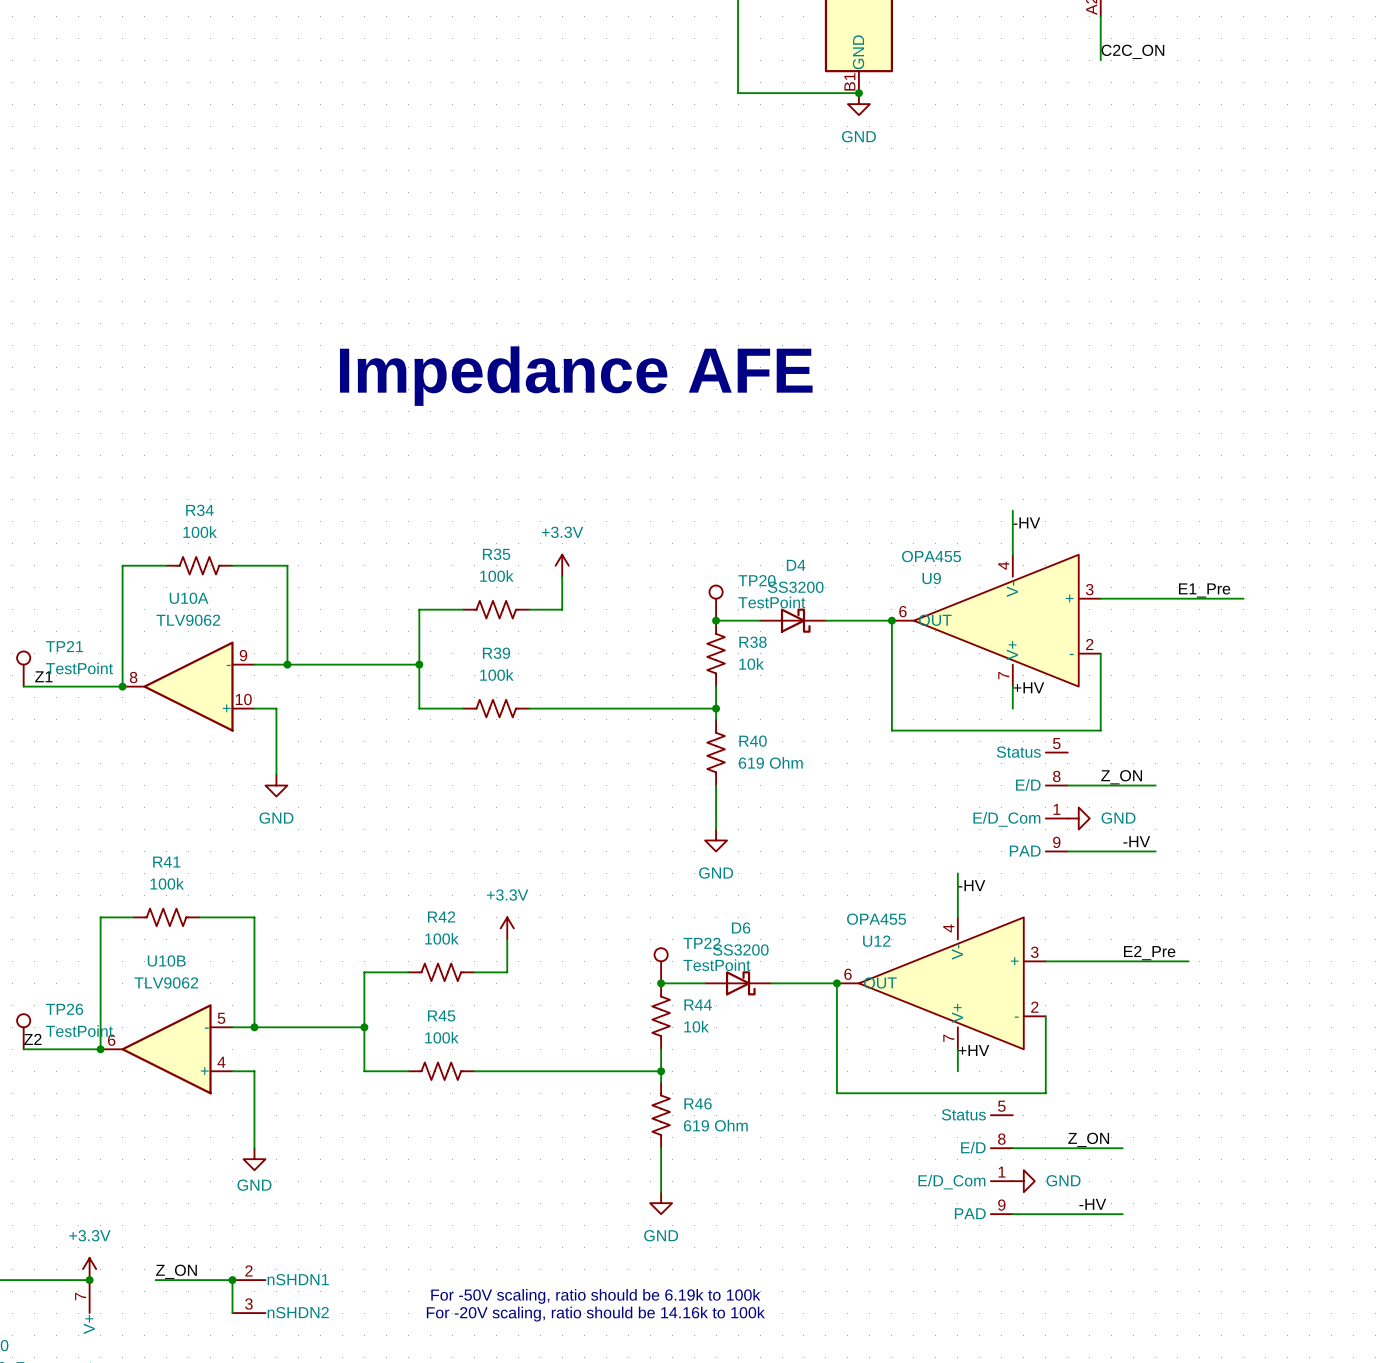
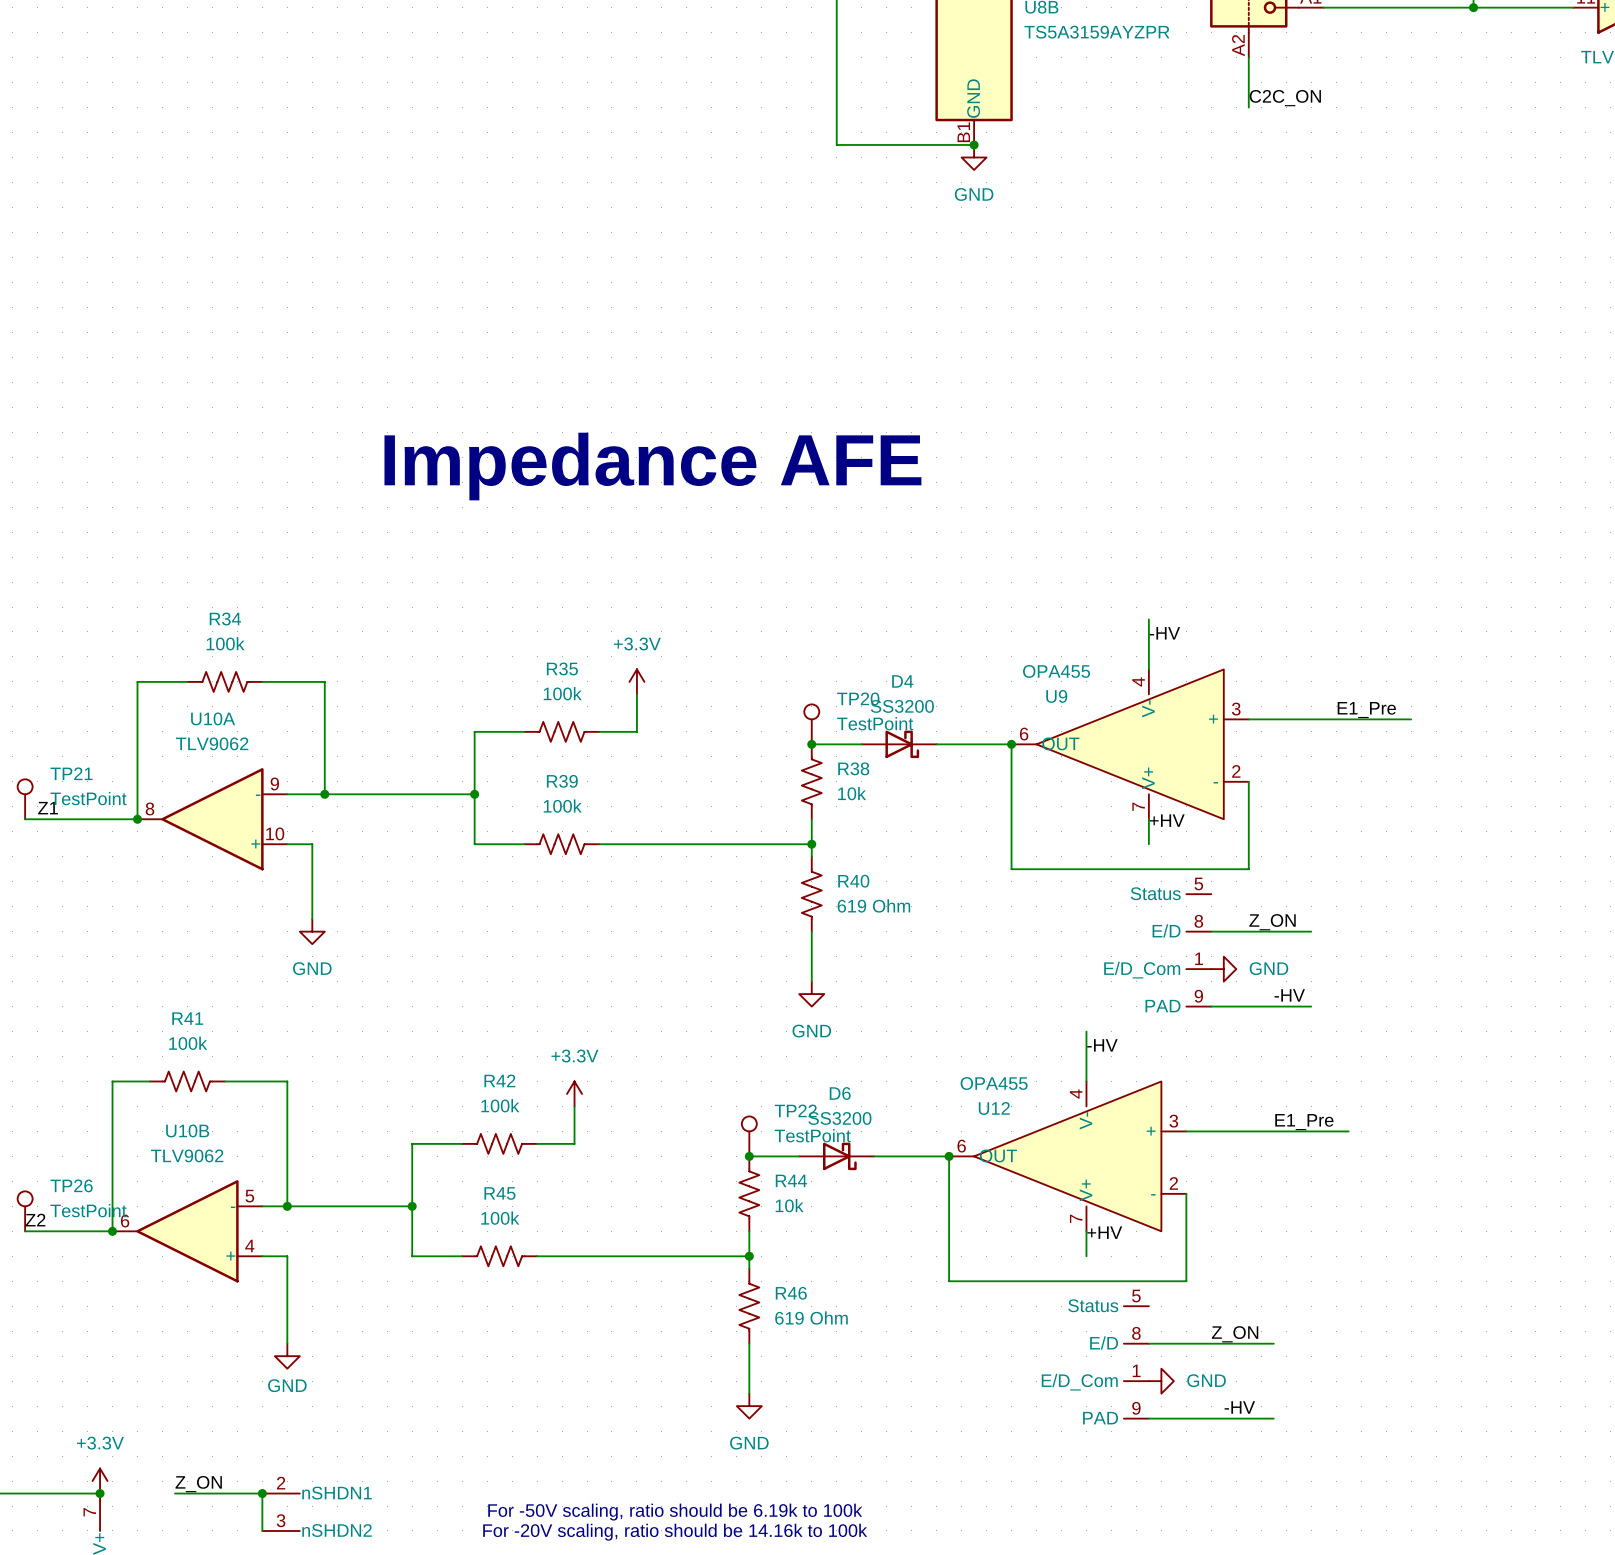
label: E2_Pre (1149, 953) -> E1_Pre (1304, 1122)

